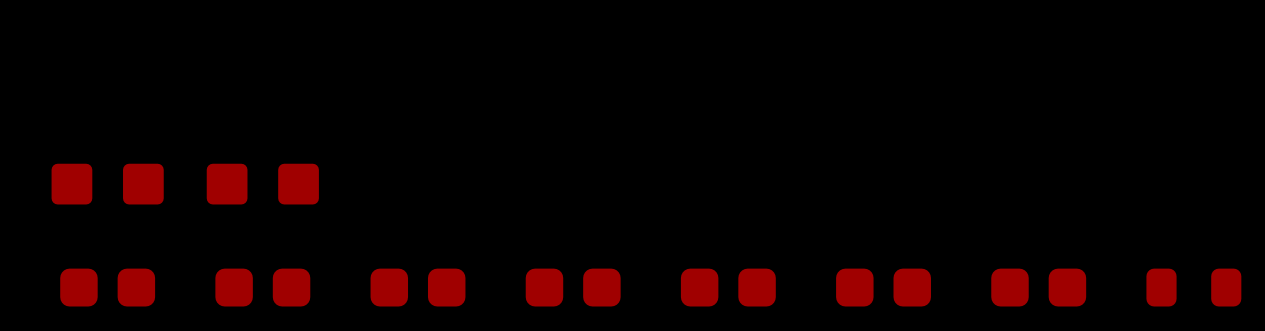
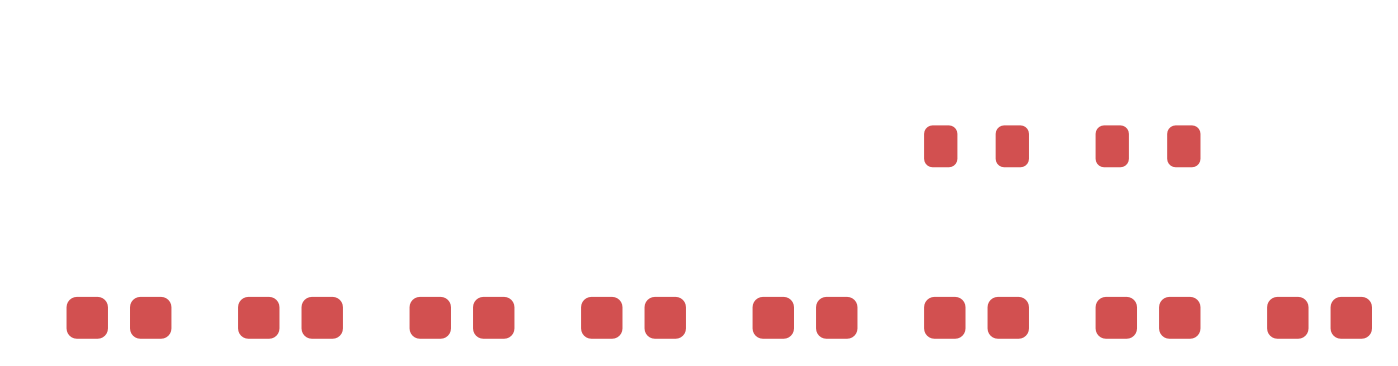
part: none -> (976, 146)
part: none -> (1148, 146)
part: (107, 184) -> none
part: (262, 184) -> none
part footprint: [1146, 268, 1242, 307] -> [1267, 296, 1372, 339]

